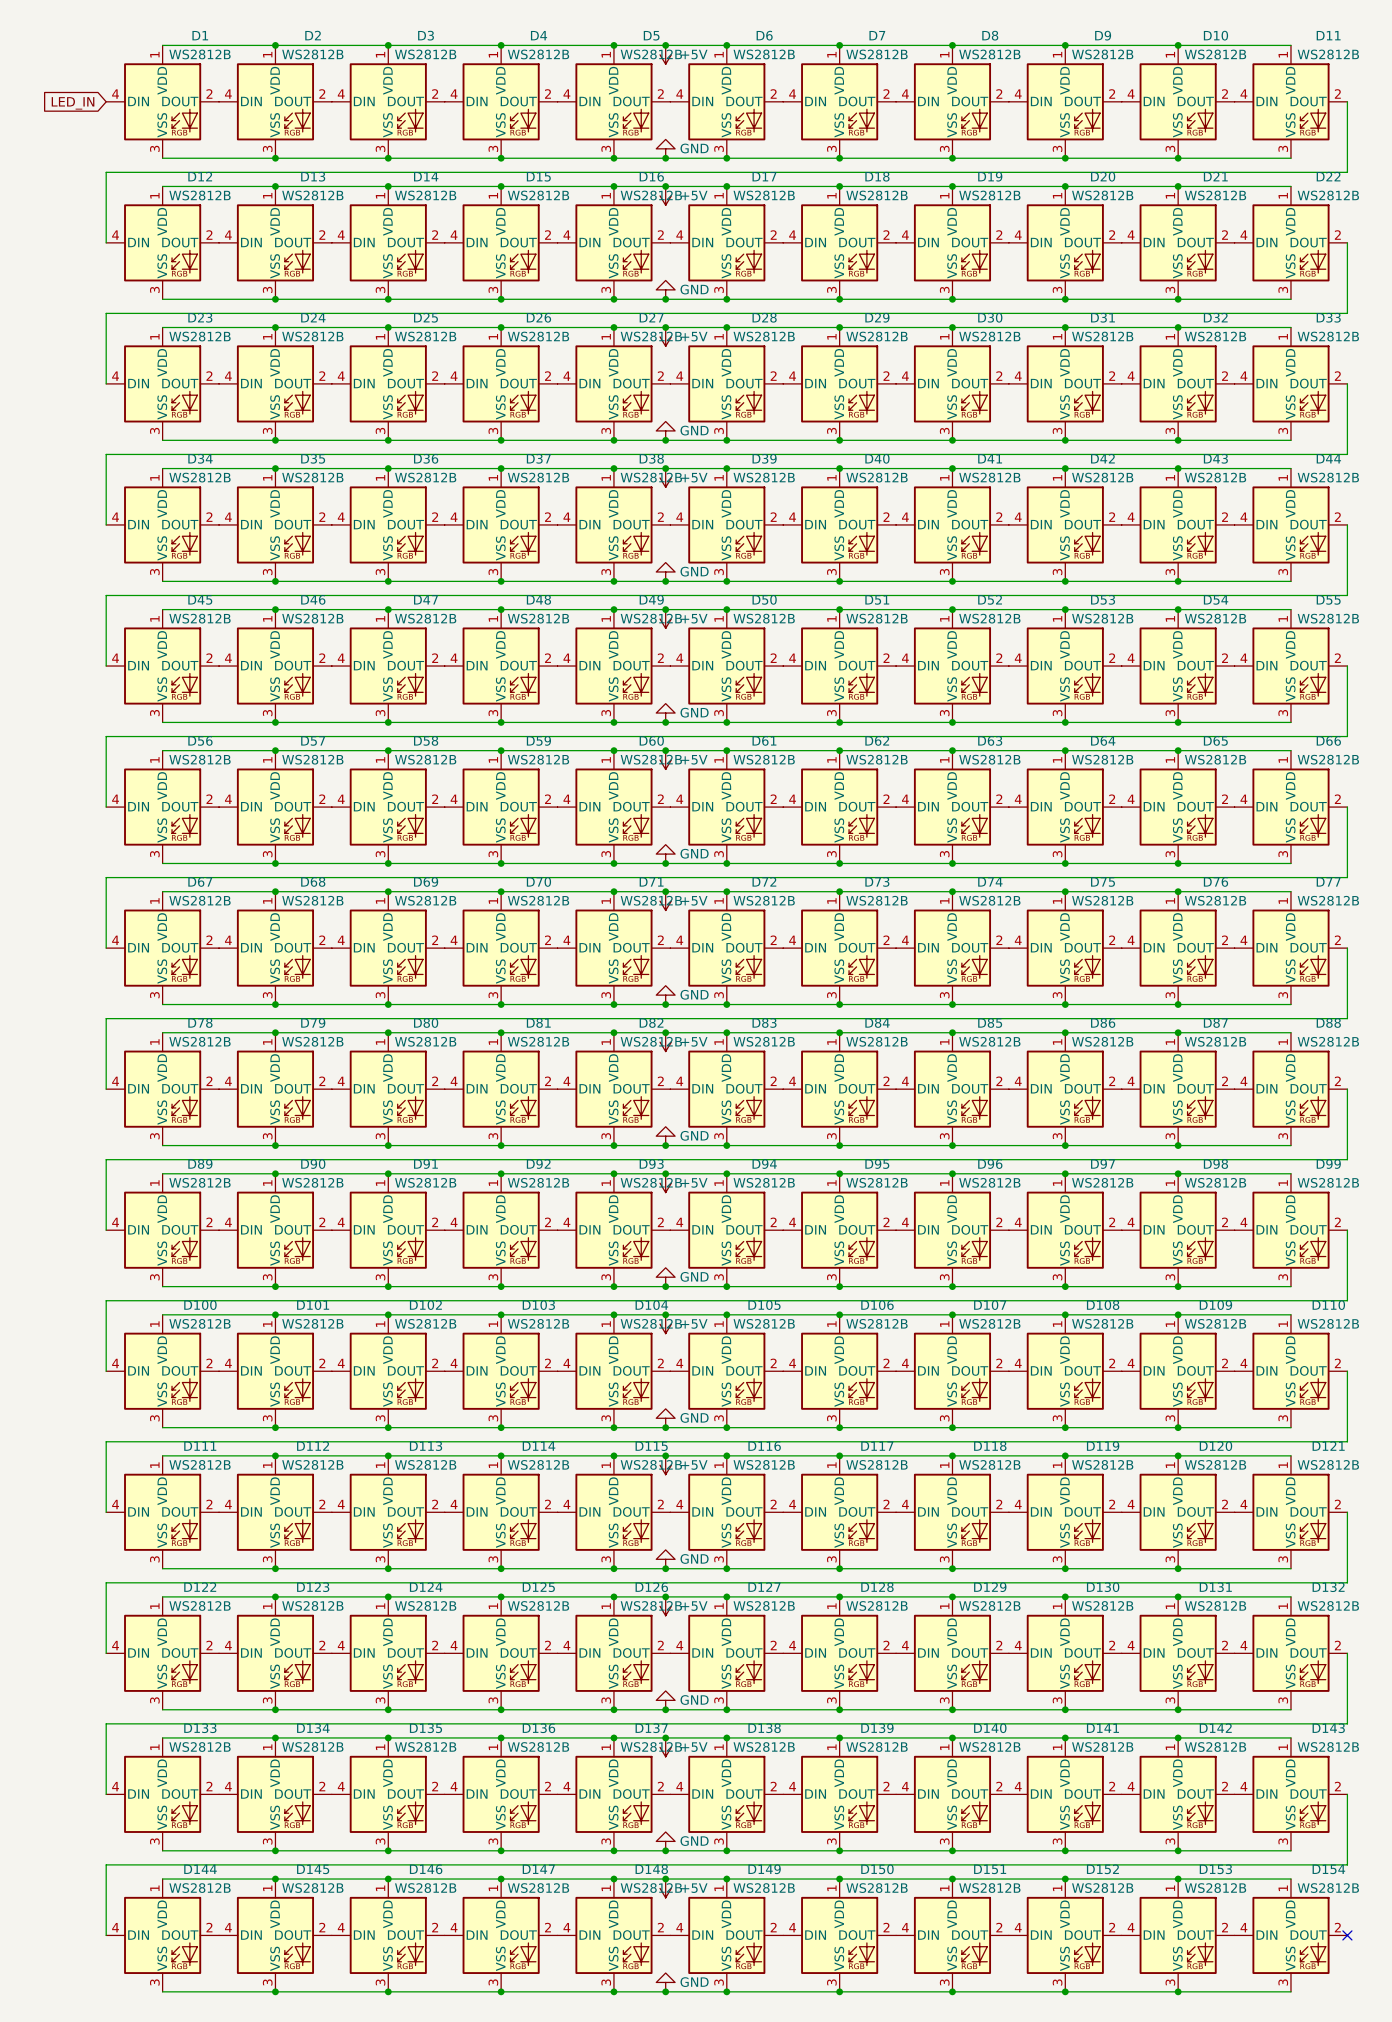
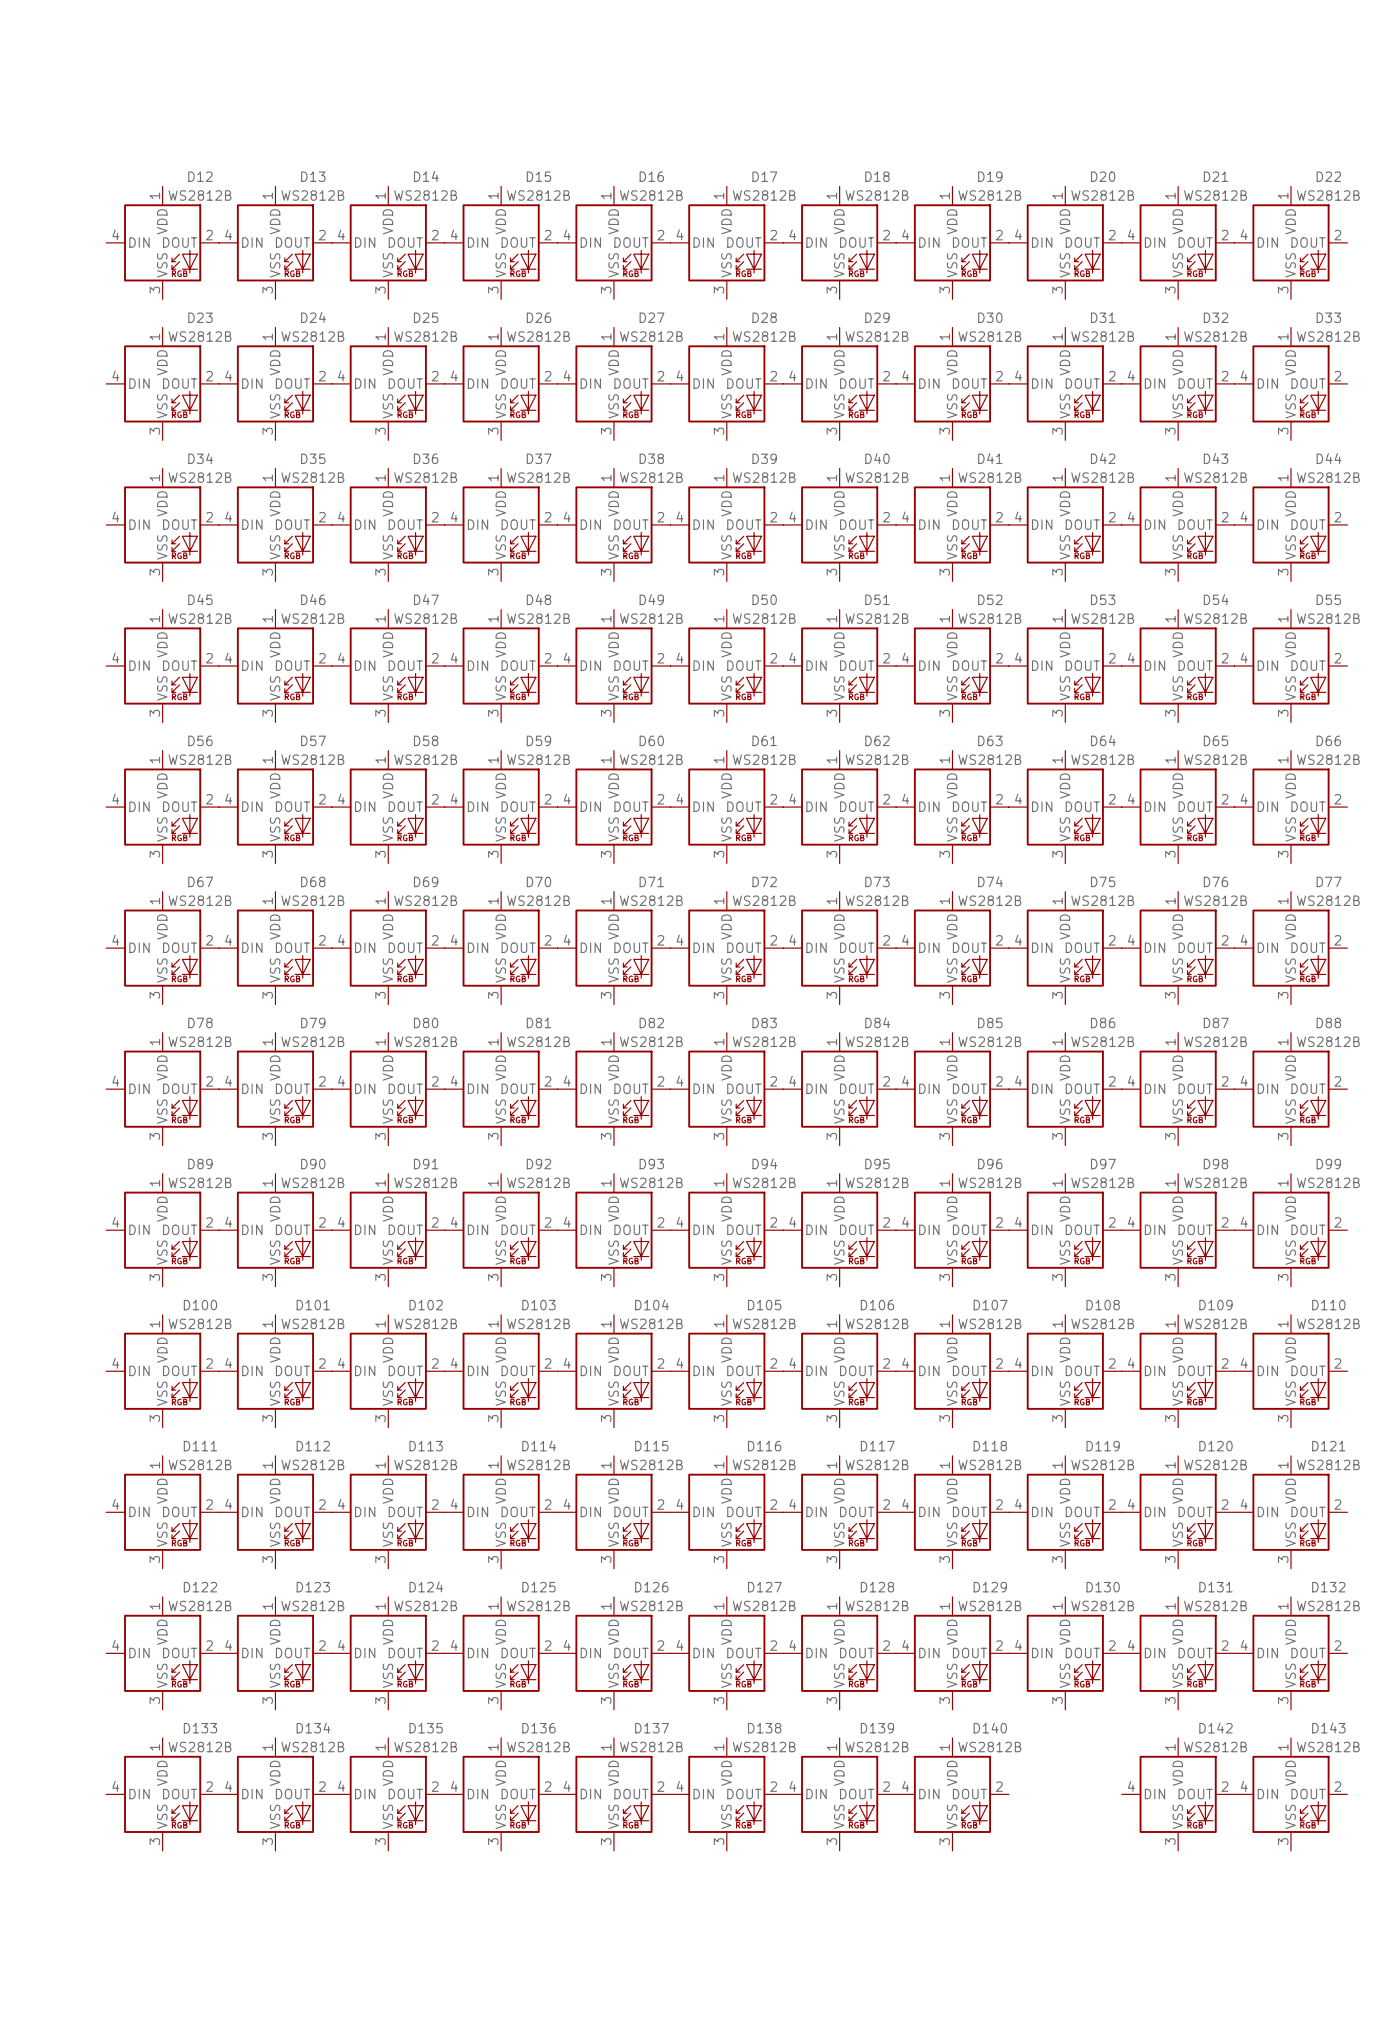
wire: (162, 45) (1290, 45) -> none
junction: (275, 45) -> none
junction: (388, 45) -> none
junction: (501, 45) -> none
junction: (613, 45) -> none
junction: (665, 45) -> none
junction: (726, 45) -> none
junction: (839, 45) -> none
junction: (952, 45) -> none
junction: (1065, 45) -> none
junction: (1178, 45) -> none
power symbol: +5V (665, 54) -> none
D1: WS2812B (162, 101) -> none
D2: WS2812B (275, 101) -> none
D3: WS2812B (388, 101) -> none
D4: WS2812B (501, 101) -> none
D5: WS2812B (613, 101) -> none
D6: WS2812B (726, 101) -> none
D7: WS2812B (839, 101) -> none
D8: WS2812B (952, 101) -> none
D9: WS2812B (1065, 101) -> none
D10: WS2812B (1178, 101) -> none
D11: WS2812B (1290, 101) -> none
wire: (1347, 101) (1347, 172) (106, 172) (106, 242) -> none
global label: LED_IN (73, 103) -> none
power symbol: GND (665, 148) -> none
wire: (162, 158) (1290, 158) -> none
junction: (275, 158) -> none
junction: (388, 158) -> none
junction: (501, 158) -> none
junction: (613, 158) -> none
junction: (665, 158) -> none
junction: (726, 158) -> none
junction: (839, 158) -> none
junction: (952, 158) -> none
junction: (1065, 158) -> none
junction: (1178, 158) -> none
wire: (162, 186) (1290, 186) -> none
junction: (275, 186) -> none
junction: (388, 186) -> none
junction: (501, 186) -> none
junction: (613, 186) -> none
junction: (665, 186) -> none
junction: (726, 186) -> none
junction: (839, 186) -> none
junction: (952, 186) -> none
junction: (1065, 186) -> none
junction: (1178, 186) -> none
power symbol: +5V (665, 195) -> none
wire: (1347, 242) (1347, 313) (106, 313) (106, 383) -> none
power symbol: GND (665, 289) -> none
wire: (162, 299) (1290, 299) -> none
junction: (275, 299) -> none
junction: (388, 299) -> none
junction: (501, 299) -> none
junction: (613, 299) -> none
junction: (665, 299) -> none
junction: (726, 299) -> none
junction: (839, 299) -> none
junction: (952, 299) -> none
junction: (1065, 299) -> none
junction: (1178, 299) -> none
wire: (162, 327) (1290, 327) -> none
junction: (275, 327) -> none
junction: (388, 327) -> none
junction: (501, 327) -> none
junction: (613, 327) -> none
junction: (665, 327) -> none
junction: (726, 327) -> none
junction: (839, 327) -> none
junction: (952, 327) -> none
junction: (1065, 327) -> none
junction: (1178, 327) -> none
power symbol: +5V (665, 336) -> none
wire: (1347, 383) (1347, 454) (106, 454) (106, 524) -> none
power symbol: GND (665, 430) -> none
wire: (162, 440) (1290, 440) -> none
junction: (275, 440) -> none
junction: (388, 440) -> none
junction: (501, 440) -> none
junction: (613, 440) -> none
junction: (665, 440) -> none
junction: (726, 440) -> none
junction: (839, 440) -> none
junction: (952, 440) -> none
junction: (1065, 440) -> none
junction: (1178, 440) -> none
wire: (162, 468) (1290, 468) -> none
junction: (275, 468) -> none
junction: (388, 468) -> none
junction: (501, 468) -> none
junction: (613, 468) -> none
junction: (665, 468) -> none
junction: (726, 468) -> none
junction: (839, 468) -> none
junction: (952, 468) -> none
junction: (1065, 468) -> none
junction: (1178, 468) -> none
power symbol: +5V (665, 477) -> none
wire: (1347, 524) (1347, 595) (106, 595) (106, 666) -> none
power symbol: GND (665, 571) -> none
wire: (162, 581) (1290, 581) -> none
junction: (275, 581) -> none
junction: (388, 581) -> none
junction: (501, 581) -> none
junction: (613, 581) -> none
junction: (665, 581) -> none
junction: (726, 581) -> none
junction: (839, 581) -> none
junction: (952, 581) -> none
junction: (1065, 581) -> none
junction: (1178, 581) -> none
wire: (162, 609) (1290, 609) -> none
junction: (275, 609) -> none
junction: (388, 609) -> none
junction: (501, 609) -> none
junction: (613, 609) -> none
junction: (665, 609) -> none
junction: (726, 609) -> none
junction: (839, 609) -> none
junction: (952, 609) -> none
junction: (1065, 609) -> none
junction: (1178, 609) -> none
power symbol: +5V (665, 619) -> none
wire: (1347, 666) (1347, 736) (106, 736) (106, 807) -> none
power symbol: GND (665, 713) -> none
wire: (162, 722) (1290, 722) -> none
junction: (275, 722) -> none
junction: (388, 722) -> none
junction: (501, 722) -> none
junction: (613, 722) -> none
junction: (665, 722) -> none
junction: (726, 722) -> none
junction: (839, 722) -> none
junction: (952, 722) -> none
junction: (1065, 722) -> none
junction: (1178, 722) -> none
wire: (162, 750) (1290, 750) -> none
junction: (275, 750) -> none
junction: (388, 750) -> none
junction: (501, 750) -> none
junction: (613, 750) -> none
junction: (665, 750) -> none
junction: (726, 750) -> none
junction: (839, 750) -> none
junction: (952, 750) -> none
junction: (1065, 750) -> none
junction: (1178, 750) -> none
power symbol: +5V (665, 760) -> none
wire: (1347, 807) (1347, 877) (106, 877) (106, 948) -> none
power symbol: GND (665, 854) -> none
wire: (162, 863) (1290, 863) -> none
junction: (275, 863) -> none
junction: (388, 863) -> none
junction: (501, 863) -> none
junction: (613, 863) -> none
junction: (665, 863) -> none
junction: (726, 863) -> none
junction: (839, 863) -> none
junction: (952, 863) -> none
junction: (1065, 863) -> none
junction: (1178, 863) -> none
wire: (162, 891) (1290, 891) -> none
junction: (275, 891) -> none
junction: (388, 891) -> none
junction: (501, 891) -> none
junction: (613, 891) -> none
junction: (665, 891) -> none
junction: (726, 891) -> none
junction: (839, 891) -> none
junction: (952, 891) -> none
junction: (1065, 891) -> none
junction: (1178, 891) -> none
power symbol: +5V (665, 901) -> none
wire: (1347, 948) (1347, 1018) (106, 1018) (106, 1089) -> none
power symbol: GND (665, 995) -> none
wire: (162, 1004) (1290, 1004) -> none
junction: (275, 1004) -> none
junction: (388, 1004) -> none
junction: (501, 1004) -> none
junction: (613, 1004) -> none
junction: (665, 1004) -> none
junction: (726, 1004) -> none
junction: (839, 1004) -> none
junction: (952, 1004) -> none
junction: (1065, 1004) -> none
junction: (1178, 1004) -> none
wire: (162, 1032) (1290, 1032) -> none
junction: (275, 1032) -> none
junction: (388, 1032) -> none
junction: (501, 1032) -> none
junction: (613, 1032) -> none
junction: (665, 1032) -> none
junction: (726, 1032) -> none
junction: (839, 1032) -> none
junction: (952, 1032) -> none
junction: (1065, 1032) -> none
junction: (1178, 1032) -> none
power symbol: +5V (665, 1042) -> none
wire: (1347, 1089) (1347, 1159) (106, 1159) (106, 1230) -> none
power symbol: GND (665, 1136) -> none
wire: (162, 1145) (1290, 1145) -> none
junction: (275, 1145) -> none
junction: (388, 1145) -> none
junction: (501, 1145) -> none
junction: (613, 1145) -> none
junction: (665, 1145) -> none
junction: (726, 1145) -> none
junction: (839, 1145) -> none
junction: (952, 1145) -> none
junction: (1065, 1145) -> none
junction: (1178, 1145) -> none
wire: (162, 1173) (1290, 1173) -> none
junction: (275, 1173) -> none
junction: (388, 1173) -> none
junction: (501, 1173) -> none
junction: (613, 1173) -> none
junction: (665, 1173) -> none
junction: (726, 1173) -> none
junction: (839, 1173) -> none
junction: (952, 1173) -> none
junction: (1065, 1173) -> none
junction: (1178, 1173) -> none
power symbol: +5V (665, 1183) -> none
wire: (1347, 1230) (1347, 1300) (106, 1300) (106, 1371) -> none
power symbol: GND (665, 1277) -> none
wire: (162, 1286) (1290, 1286) -> none
junction: (275, 1286) -> none
junction: (388, 1286) -> none
junction: (501, 1286) -> none
junction: (613, 1286) -> none
junction: (665, 1286) -> none
junction: (726, 1286) -> none
junction: (839, 1286) -> none
junction: (952, 1286) -> none
junction: (1065, 1286) -> none
junction: (1178, 1286) -> none
wire: (162, 1314) (1290, 1314) -> none
junction: (275, 1314) -> none
junction: (388, 1314) -> none
junction: (501, 1314) -> none
junction: (613, 1314) -> none
junction: (665, 1314) -> none
junction: (726, 1314) -> none
junction: (839, 1314) -> none
junction: (952, 1314) -> none
junction: (1065, 1314) -> none
junction: (1178, 1314) -> none
power symbol: +5V (665, 1324) -> none
wire: (1347, 1371) (1347, 1441) (106, 1441) (106, 1512) -> none
power symbol: GND (665, 1418) -> none
wire: (162, 1427) (1290, 1427) -> none
junction: (275, 1427) -> none
junction: (388, 1427) -> none
junction: (501, 1427) -> none
junction: (613, 1427) -> none
junction: (665, 1427) -> none
junction: (726, 1427) -> none
junction: (839, 1427) -> none
junction: (952, 1427) -> none
junction: (1065, 1427) -> none
junction: (1178, 1427) -> none
wire: (162, 1455) (1290, 1455) -> none
junction: (275, 1455) -> none
junction: (388, 1455) -> none
junction: (501, 1455) -> none
junction: (613, 1455) -> none
junction: (665, 1455) -> none
junction: (726, 1455) -> none
junction: (839, 1455) -> none
junction: (952, 1455) -> none
junction: (1065, 1455) -> none
junction: (1178, 1455) -> none
power symbol: +5V (665, 1465) -> none
wire: (1347, 1512) (1347, 1582) (106, 1582) (106, 1653) -> none
power symbol: GND (665, 1559) -> none
wire: (162, 1568) (1290, 1568) -> none
junction: (275, 1568) -> none
junction: (388, 1568) -> none
junction: (501, 1568) -> none
junction: (613, 1568) -> none
junction: (665, 1568) -> none
junction: (726, 1568) -> none
junction: (839, 1568) -> none
junction: (952, 1568) -> none
junction: (1065, 1568) -> none
junction: (1178, 1568) -> none
wire: (162, 1596) (1290, 1596) -> none
junction: (275, 1596) -> none
junction: (388, 1596) -> none
junction: (501, 1596) -> none
junction: (613, 1596) -> none
junction: (665, 1596) -> none
junction: (726, 1596) -> none
junction: (839, 1596) -> none
junction: (952, 1596) -> none
junction: (1065, 1596) -> none
junction: (1178, 1596) -> none
power symbol: +5V (665, 1606) -> none
wire: (1347, 1653) (1347, 1723) (106, 1723) (106, 1794) -> none
power symbol: GND (665, 1700) -> none
wire: (162, 1709) (1290, 1709) -> none
junction: (275, 1709) -> none
junction: (388, 1709) -> none
junction: (501, 1709) -> none
junction: (613, 1709) -> none
junction: (665, 1709) -> none
junction: (726, 1709) -> none
junction: (839, 1709) -> none
junction: (952, 1709) -> none
junction: (1065, 1709) -> none
junction: (1178, 1709) -> none
wire: (162, 1737) (1290, 1737) -> none
junction: (275, 1737) -> none
junction: (388, 1737) -> none
junction: (501, 1737) -> none
junction: (613, 1737) -> none
junction: (665, 1737) -> none
junction: (726, 1737) -> none
junction: (839, 1737) -> none
junction: (952, 1737) -> none
junction: (1065, 1737) -> none
junction: (1178, 1737) -> none
power symbol: +5V (665, 1747) -> none
D141: WS2812B (1065, 1794) -> none
wire: (1347, 1794) (1347, 1864) (106, 1864) (106, 1935) -> none
power symbol: GND (665, 1841) -> none
wire: (162, 1850) (1290, 1850) -> none
junction: (275, 1850) -> none
junction: (388, 1850) -> none
junction: (501, 1850) -> none
junction: (613, 1850) -> none
junction: (665, 1850) -> none
junction: (726, 1850) -> none
junction: (839, 1850) -> none
junction: (952, 1850) -> none
junction: (1065, 1850) -> none
junction: (1178, 1850) -> none
wire: (162, 1879) (1290, 1879) -> none
junction: (275, 1879) -> none
junction: (388, 1879) -> none
junction: (501, 1879) -> none
junction: (613, 1879) -> none
junction: (665, 1879) -> none
junction: (726, 1879) -> none
junction: (839, 1879) -> none
junction: (952, 1879) -> none
junction: (1065, 1879) -> none
junction: (1178, 1879) -> none
power symbol: +5V (665, 1888) -> none
D144: WS2812B (162, 1935) -> none
D145: WS2812B (275, 1935) -> none
D146: WS2812B (388, 1935) -> none
D147: WS2812B (501, 1935) -> none
D148: WS2812B (613, 1935) -> none
D149: WS2812B (726, 1935) -> none
D150: WS2812B (839, 1935) -> none
D151: WS2812B (952, 1935) -> none
D152: WS2812B (1065, 1935) -> none
D153: WS2812B (1178, 1935) -> none
D154: WS2812B (1290, 1935) -> none
no-connect mark: (1347, 1935) -> none
power symbol: GND (665, 1982) -> none
wire: (162, 1991) (1290, 1991) -> none
junction: (275, 1991) -> none
junction: (388, 1991) -> none
junction: (501, 1991) -> none
junction: (613, 1991) -> none
junction: (665, 1991) -> none
junction: (726, 1991) -> none
junction: (839, 1991) -> none
junction: (952, 1991) -> none
junction: (1065, 1991) -> none
junction: (1178, 1991) -> none

